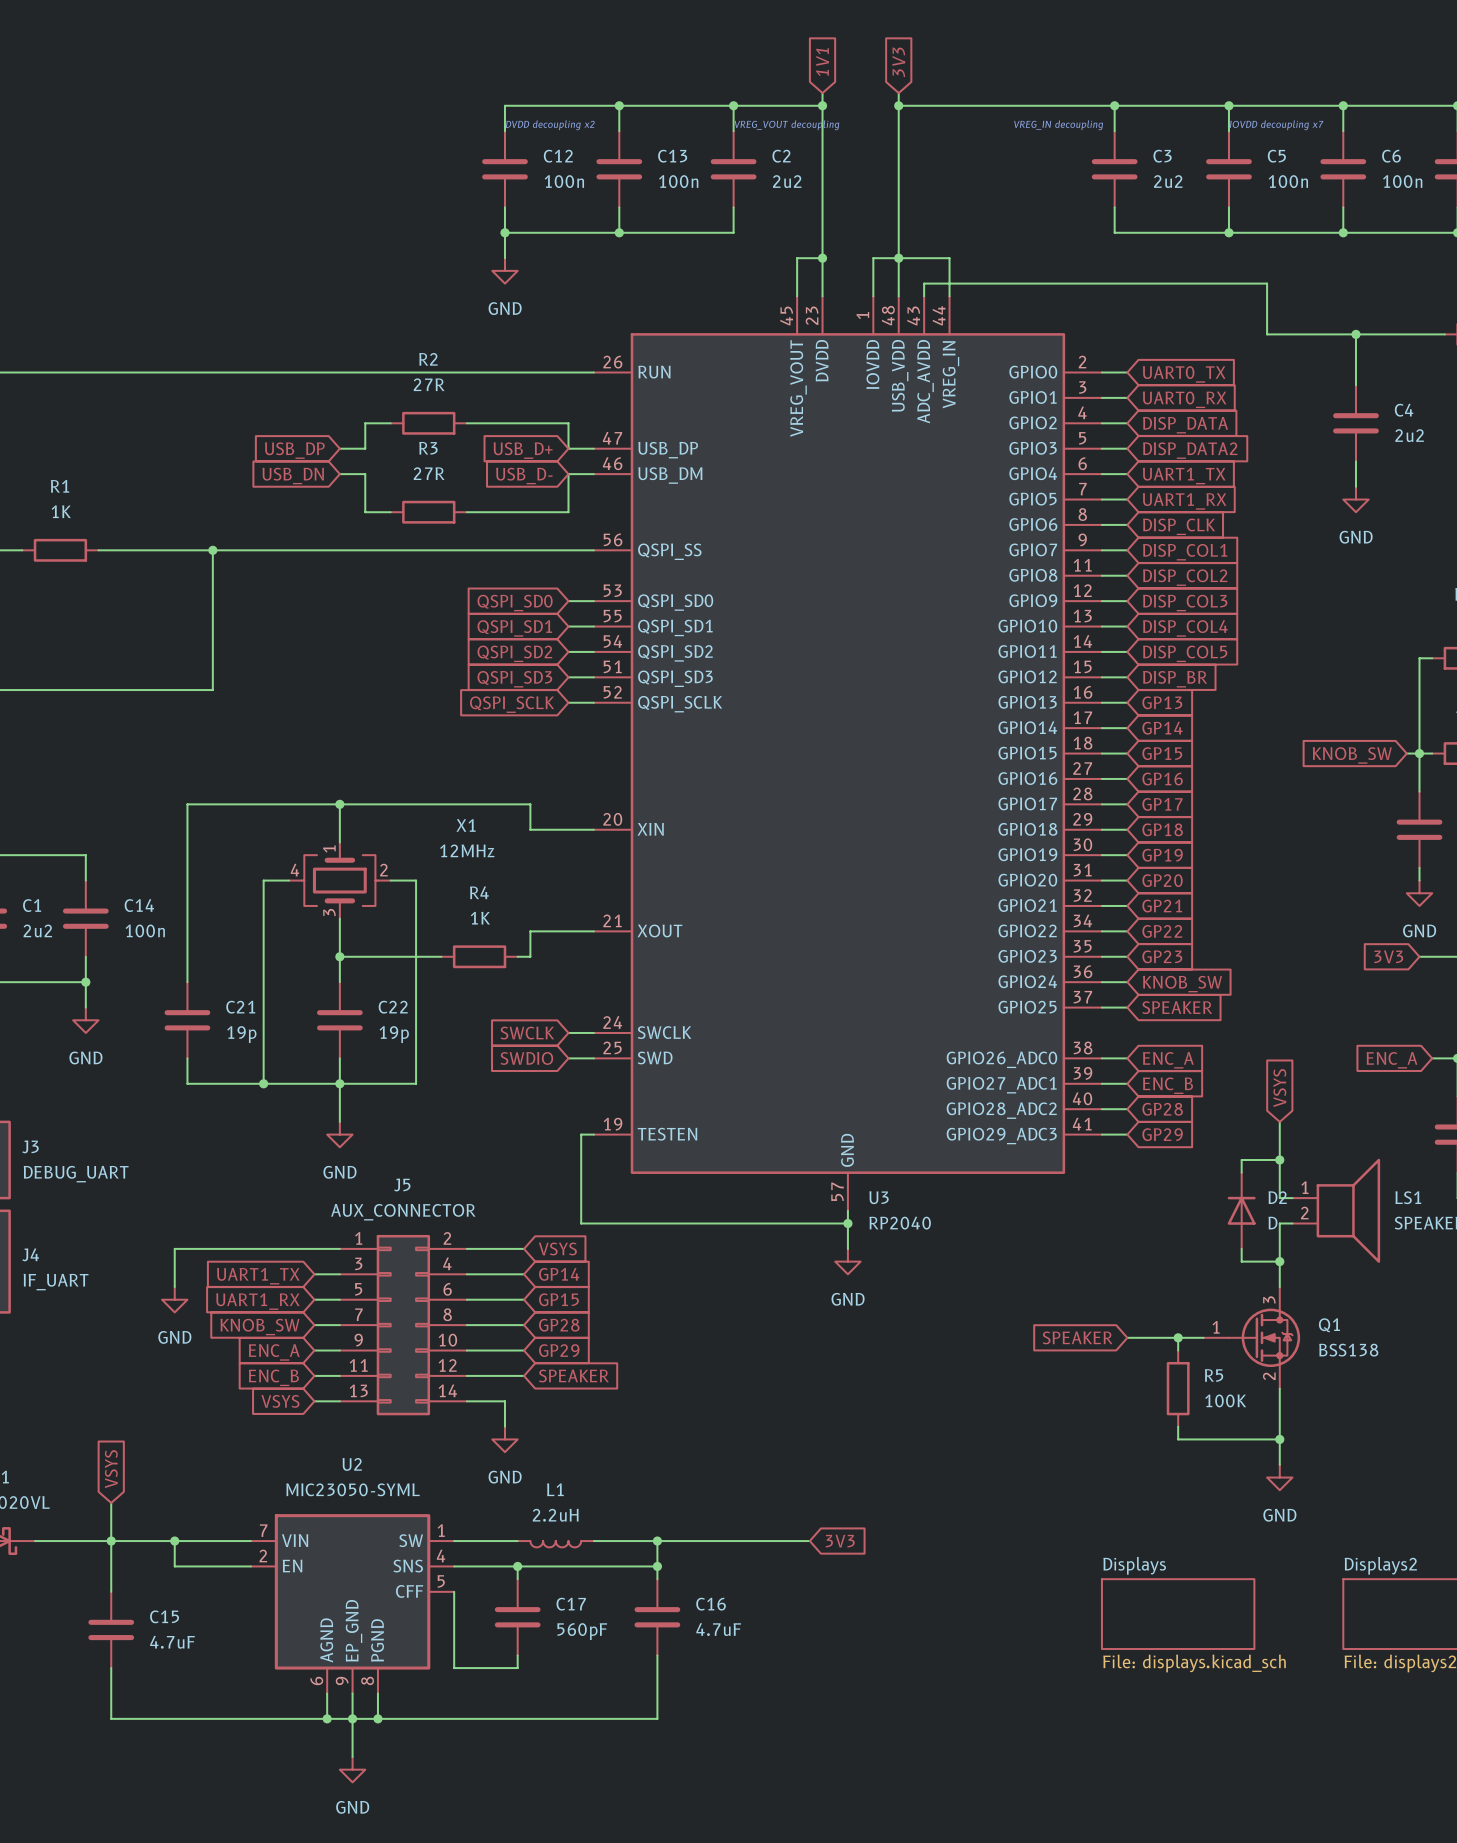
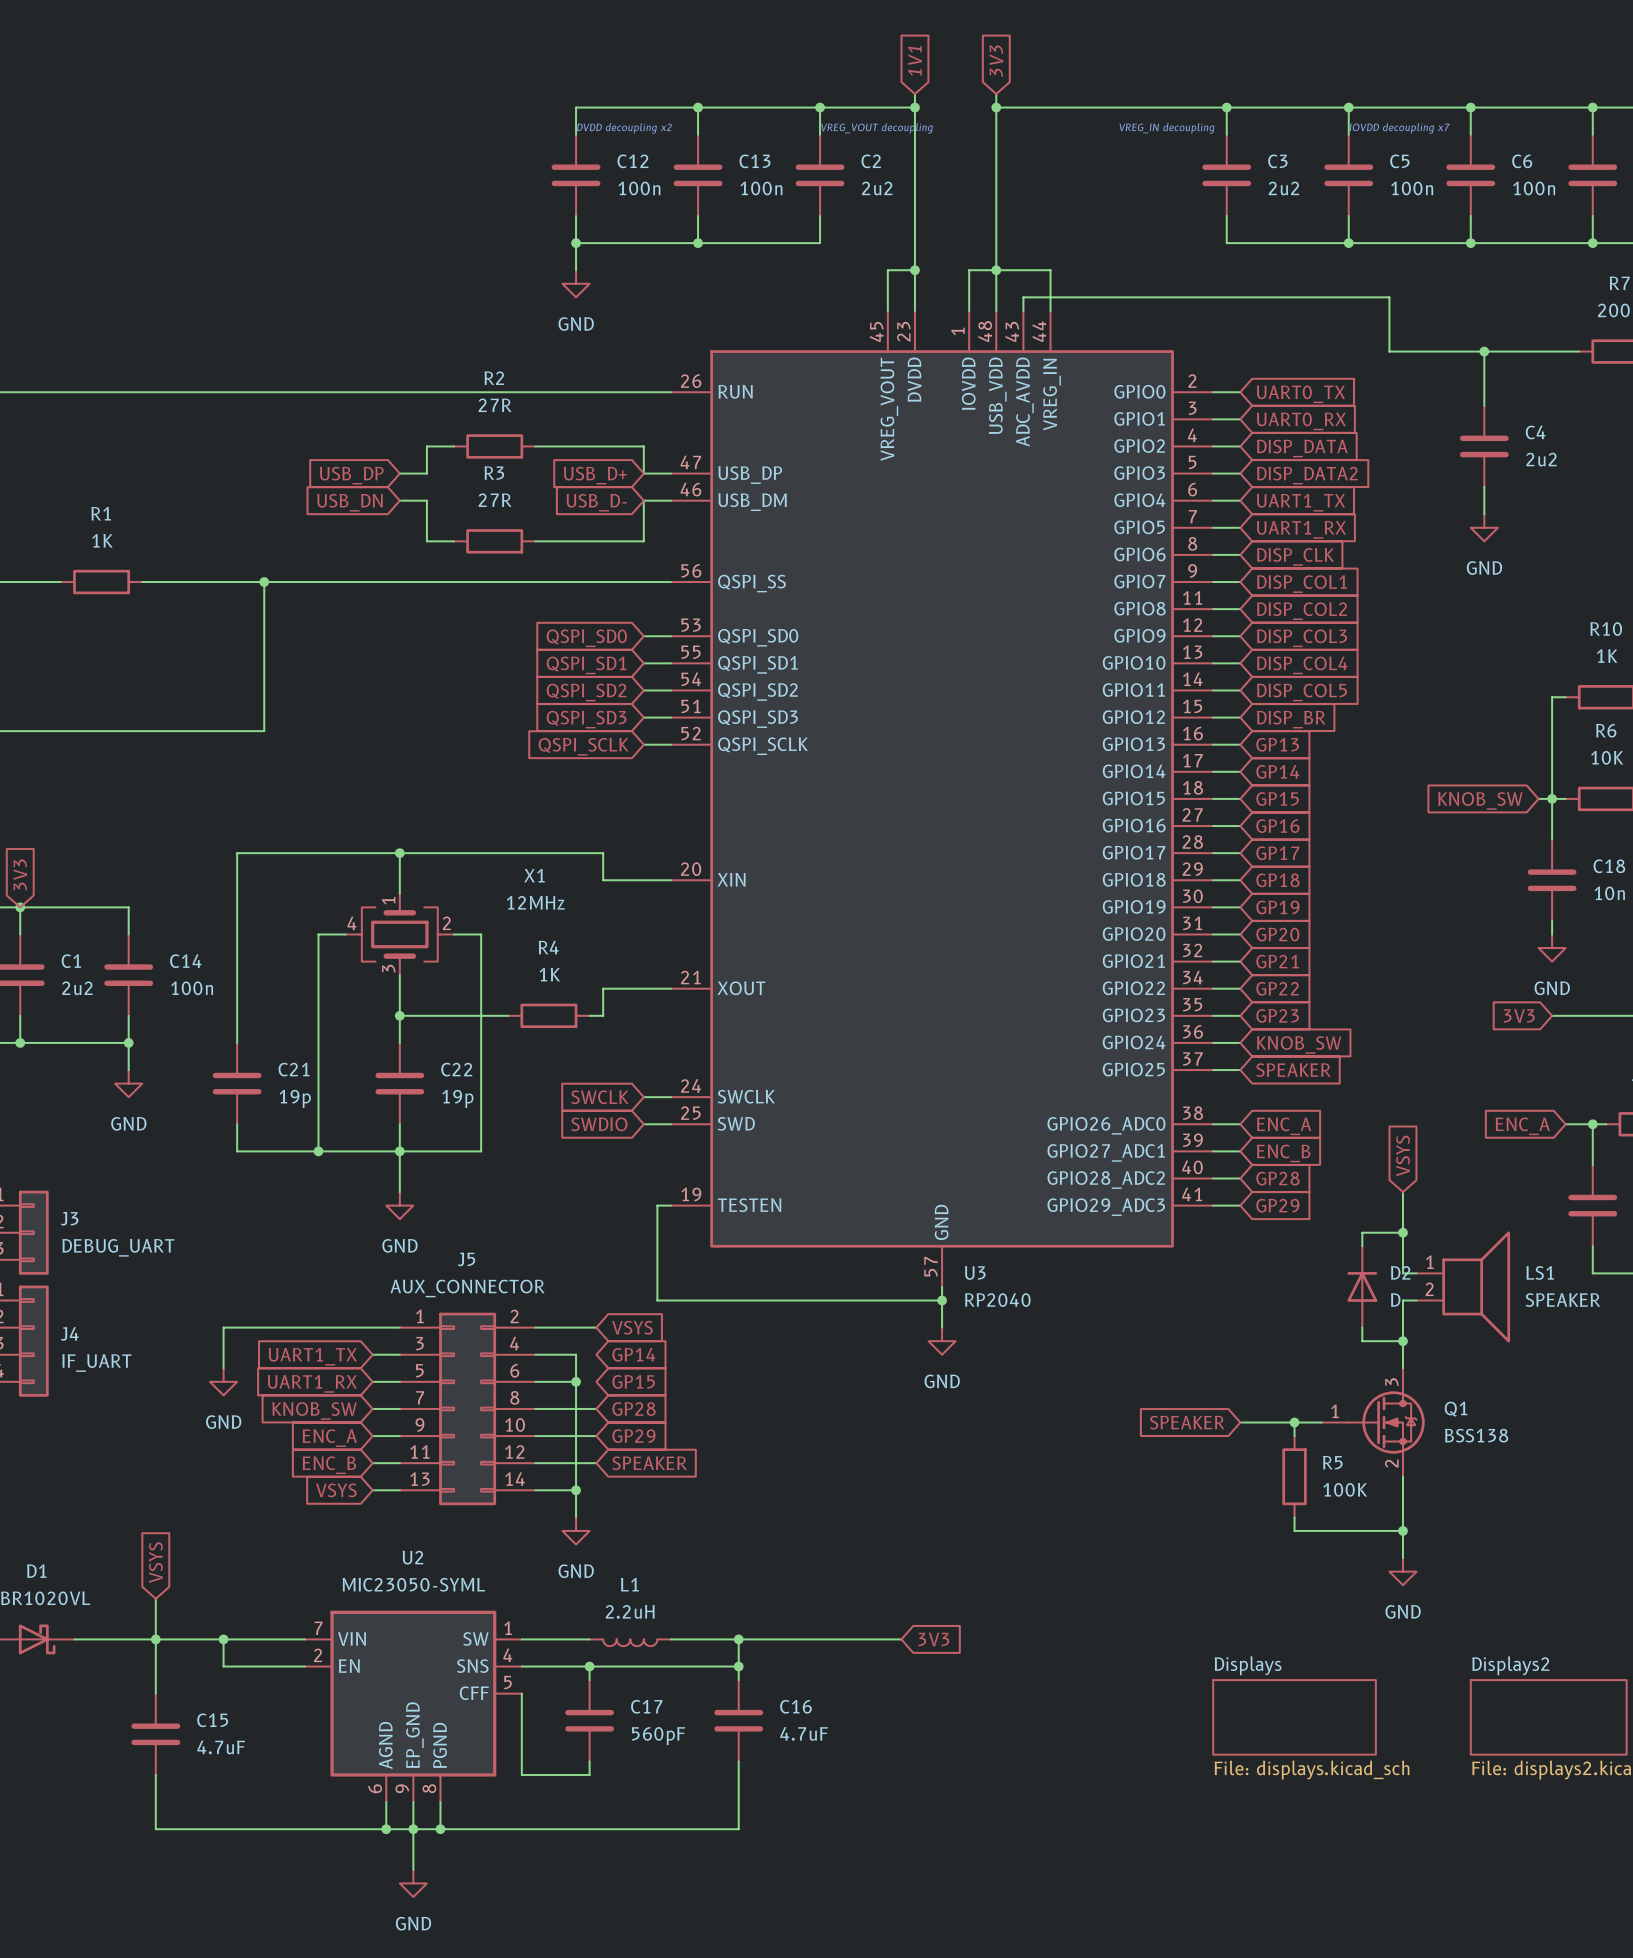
wire: (504, 1274) (524, 1274) -> (576, 1354) (576, 1490)
wire: (504, 1299) (524, 1299) -> none
junction: none -> (576, 1381)
junction: none -> (576, 1490)

